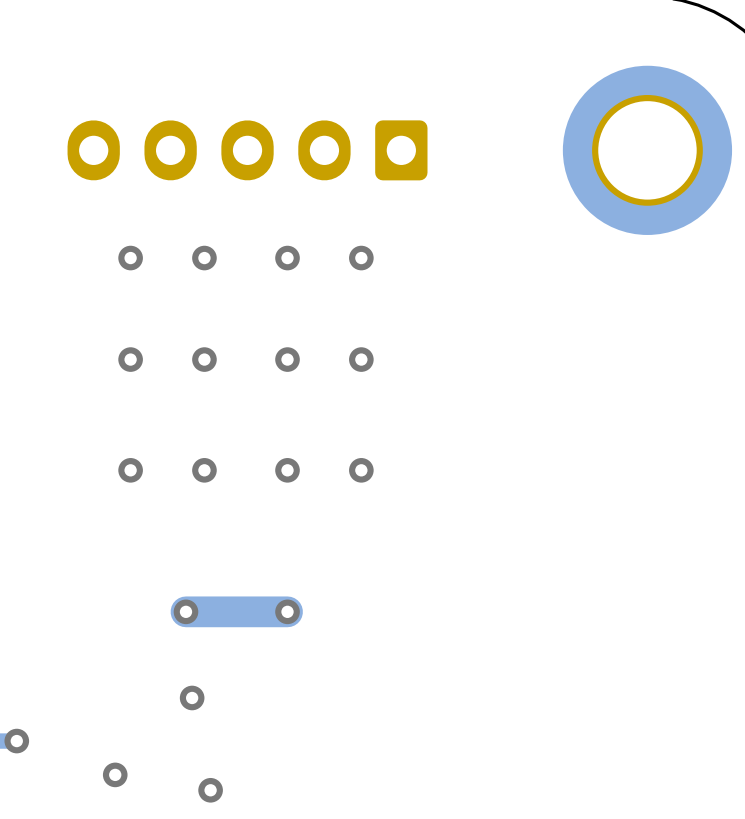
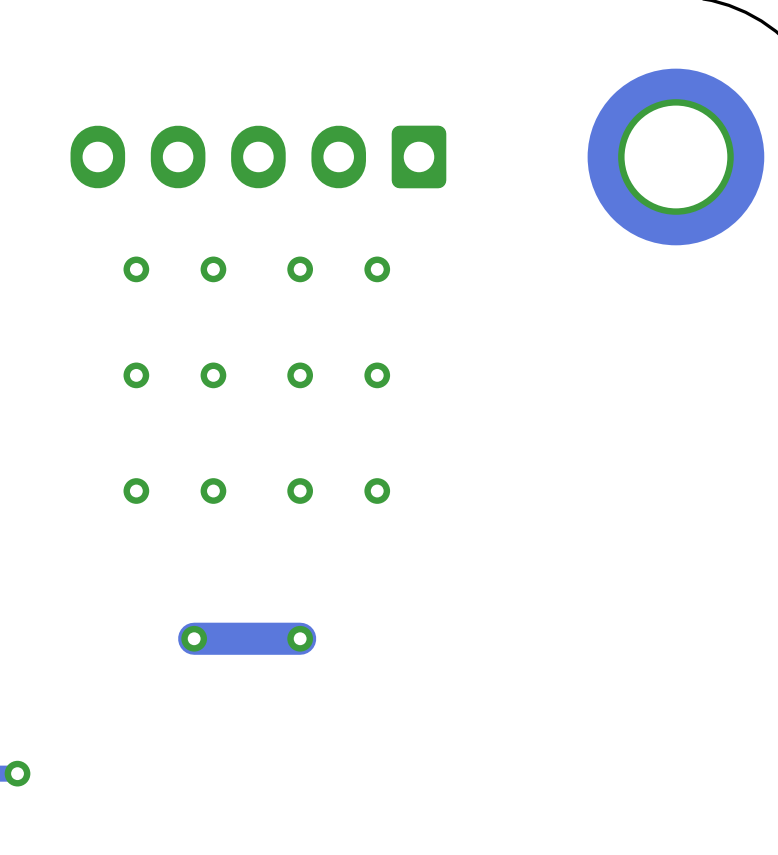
via: (192, 697) -> none
via: (115, 774) -> none
via: (210, 790) -> none

